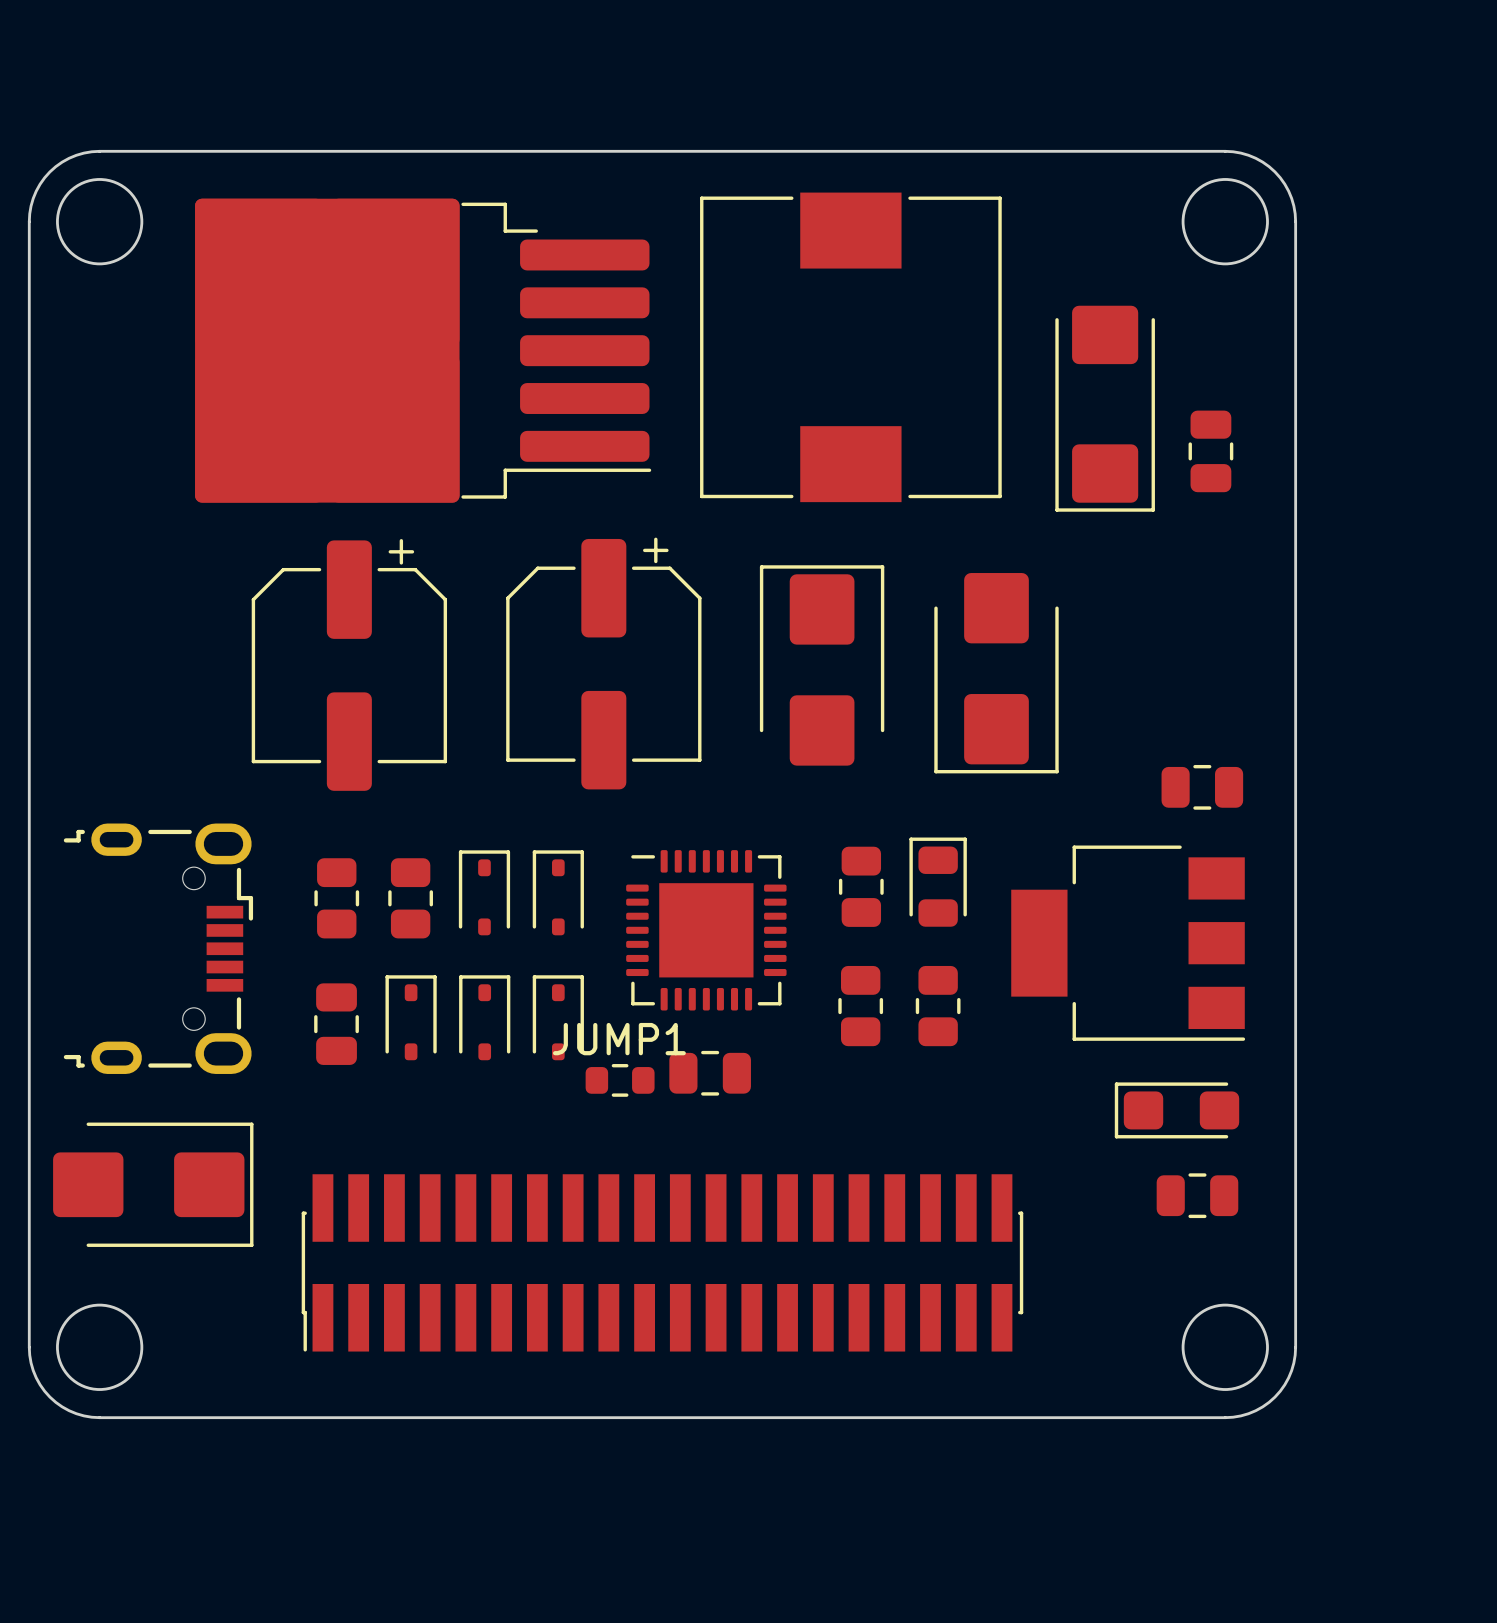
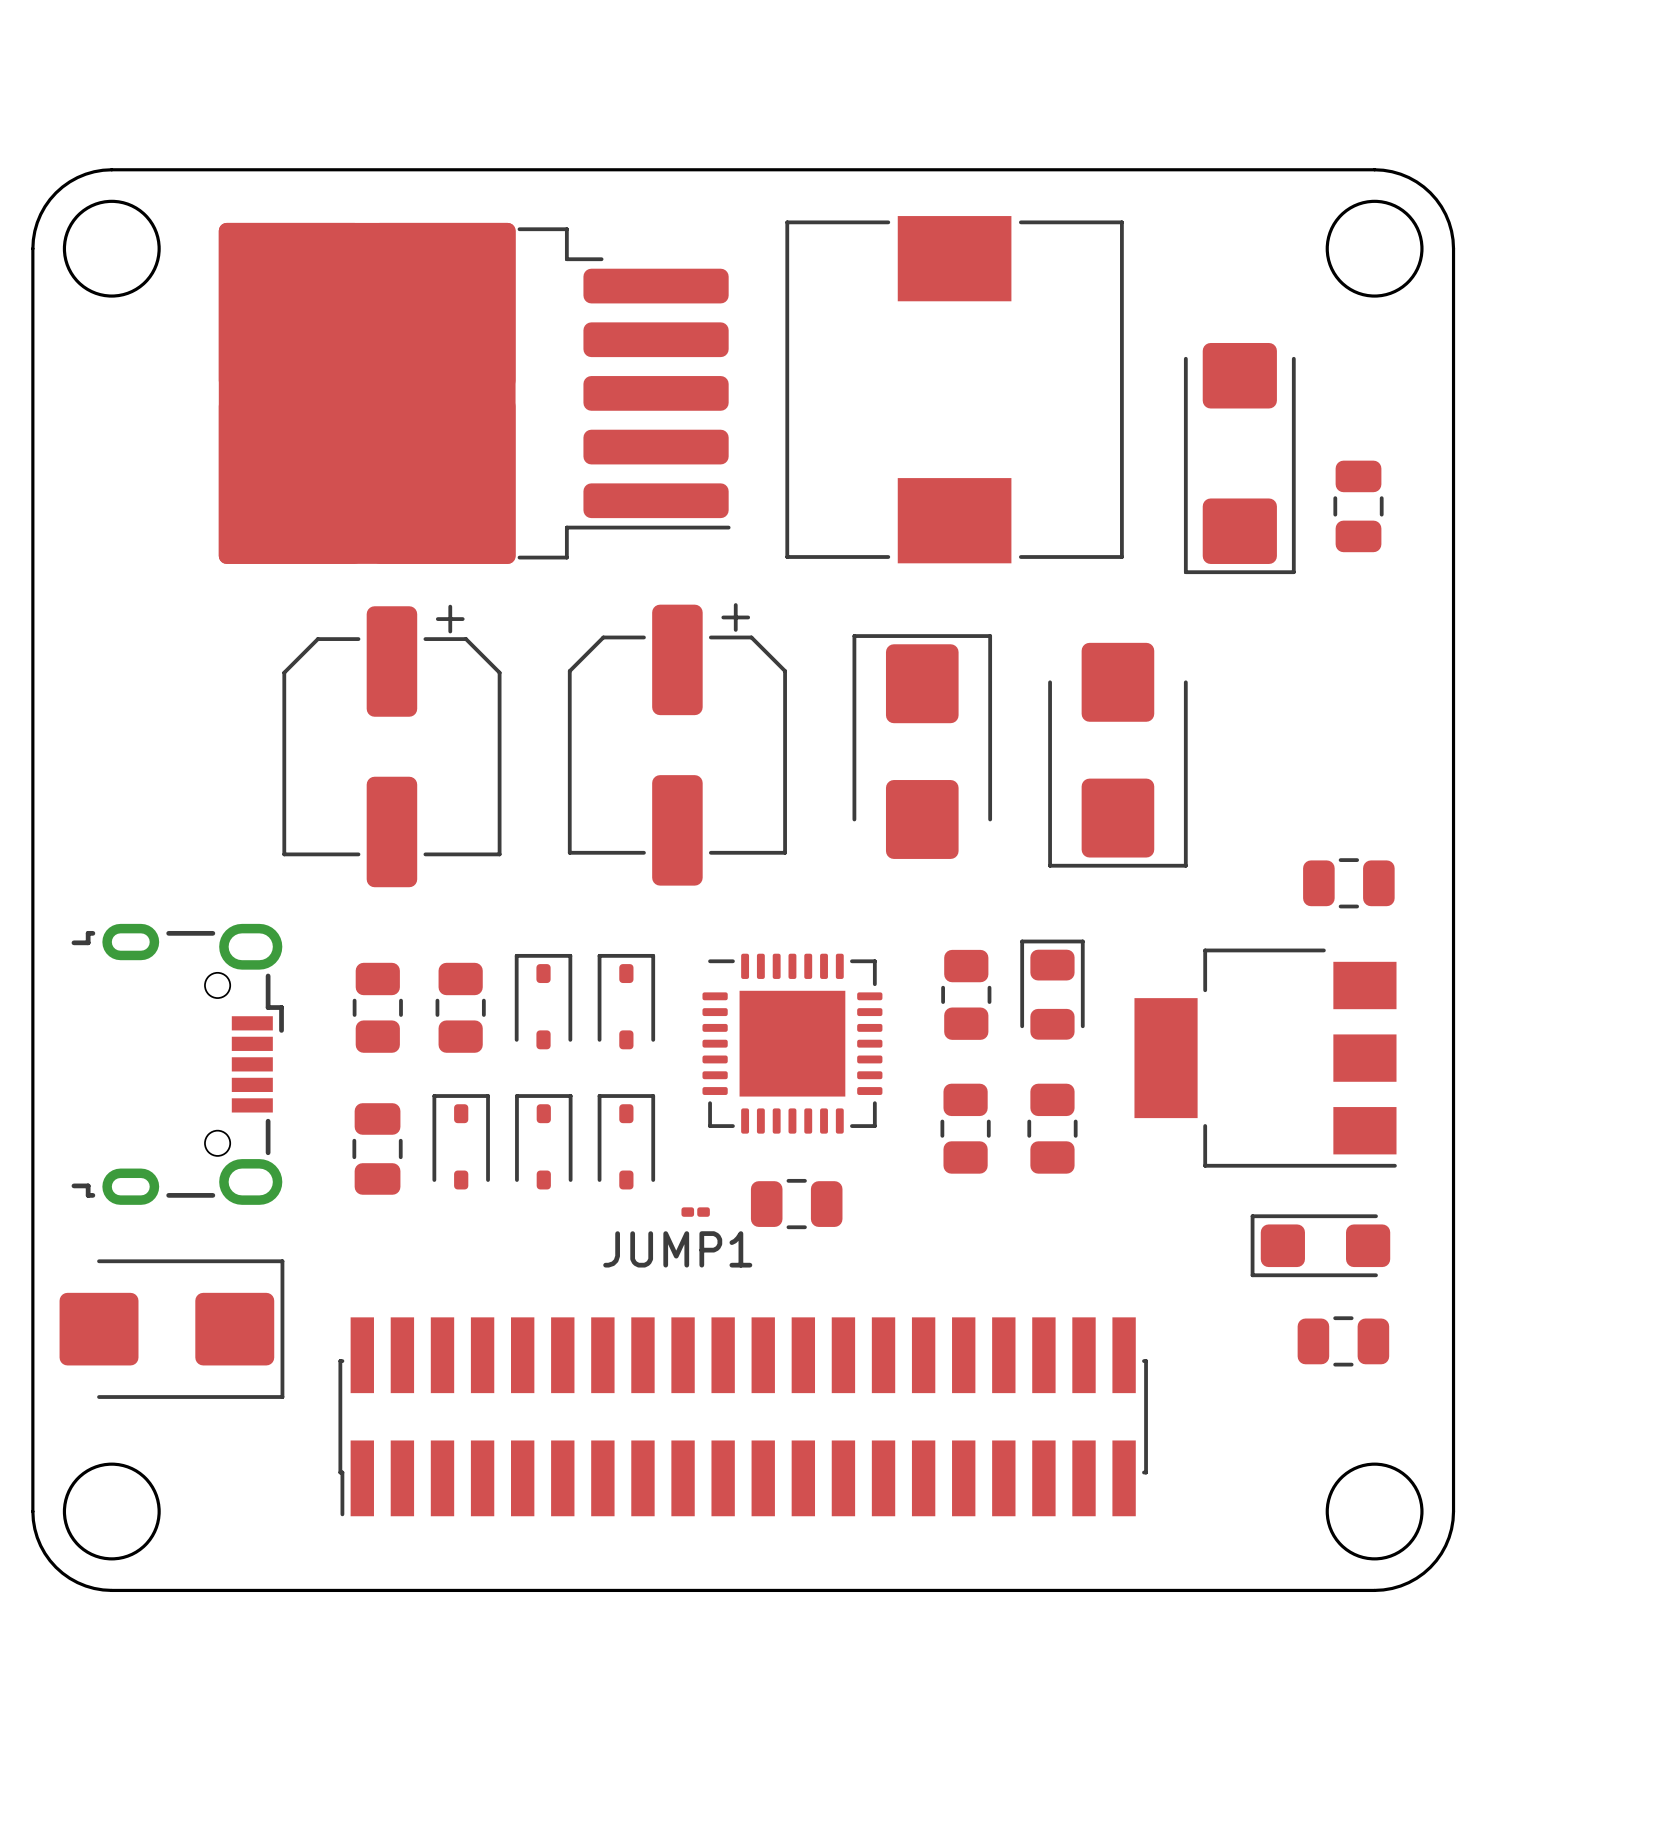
JUMP1 name position: JUMP1 (619, 1039) -> JUMP1 (677, 1249)
JUMP1 footprint: [585, 1064, 655, 1097] -> [681, 1207, 710, 1217]

